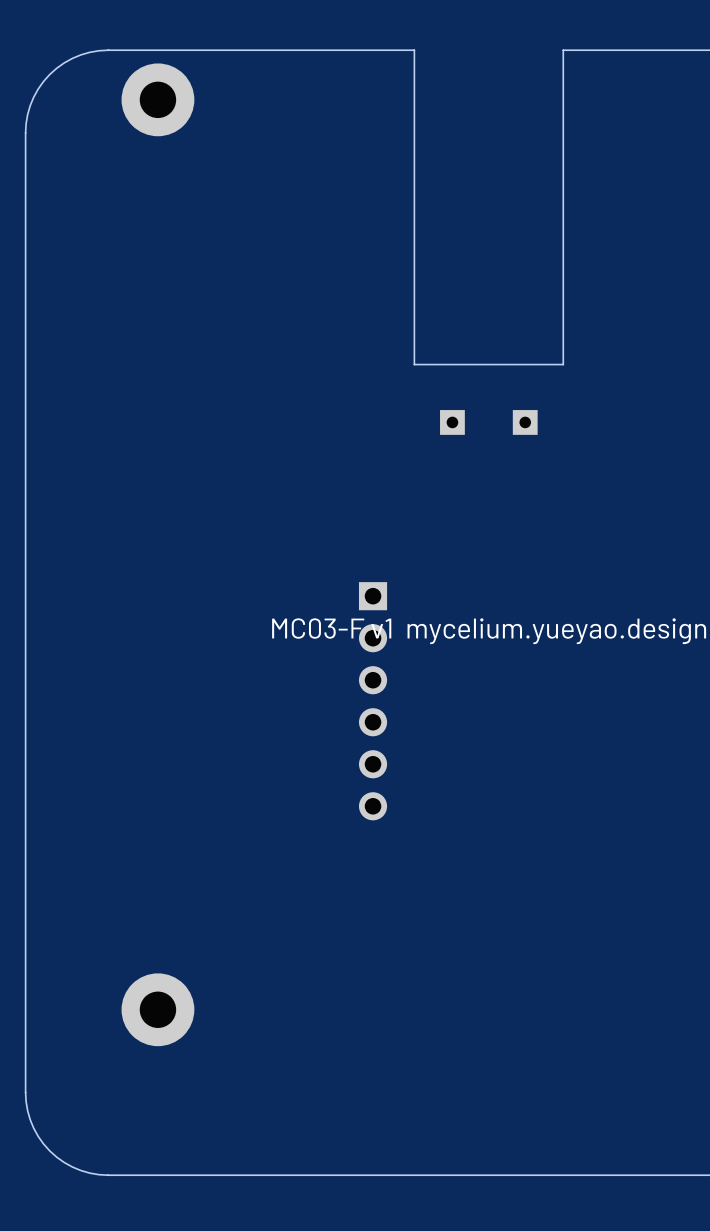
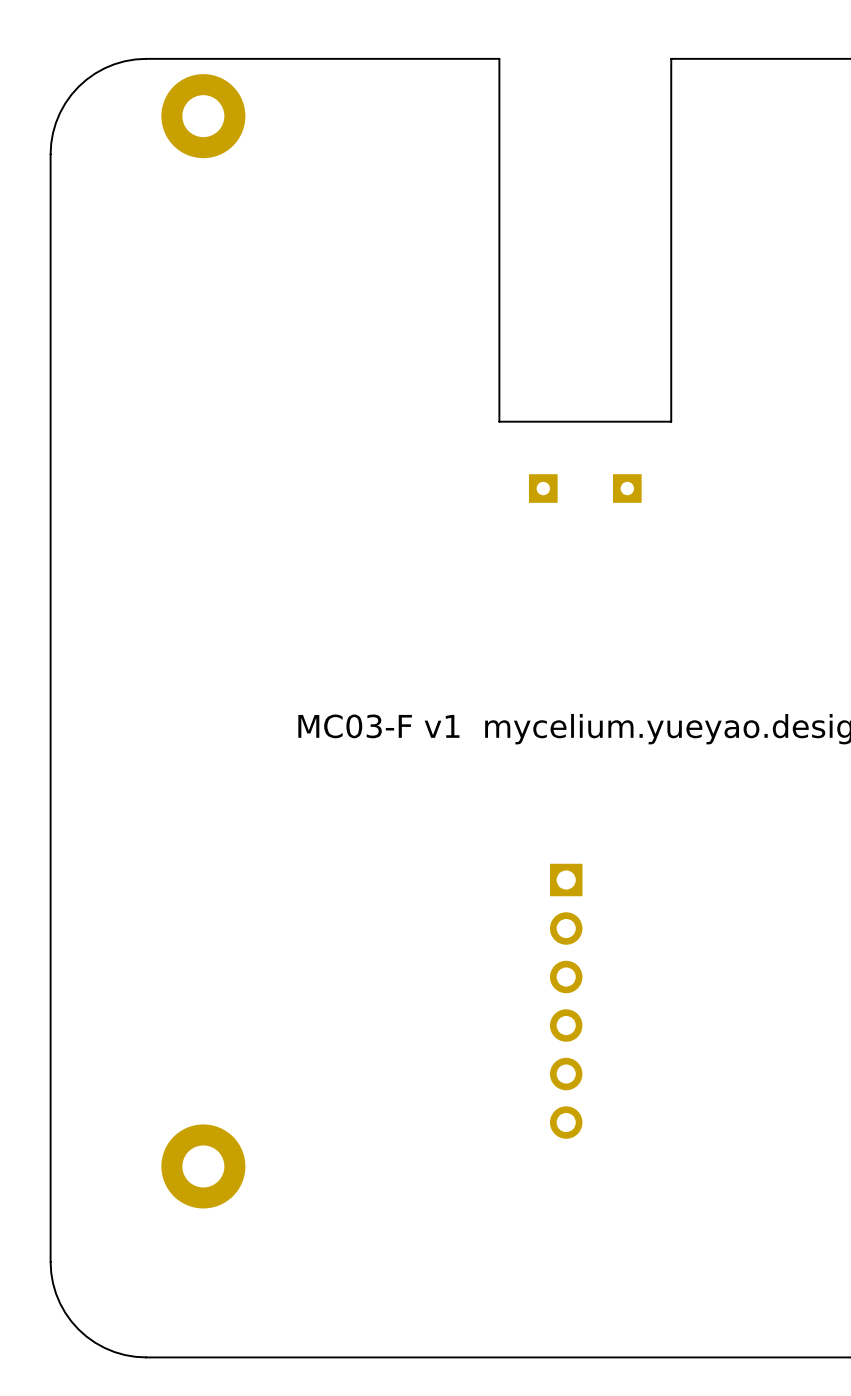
part position: (373, 701) -> (566, 1001)

